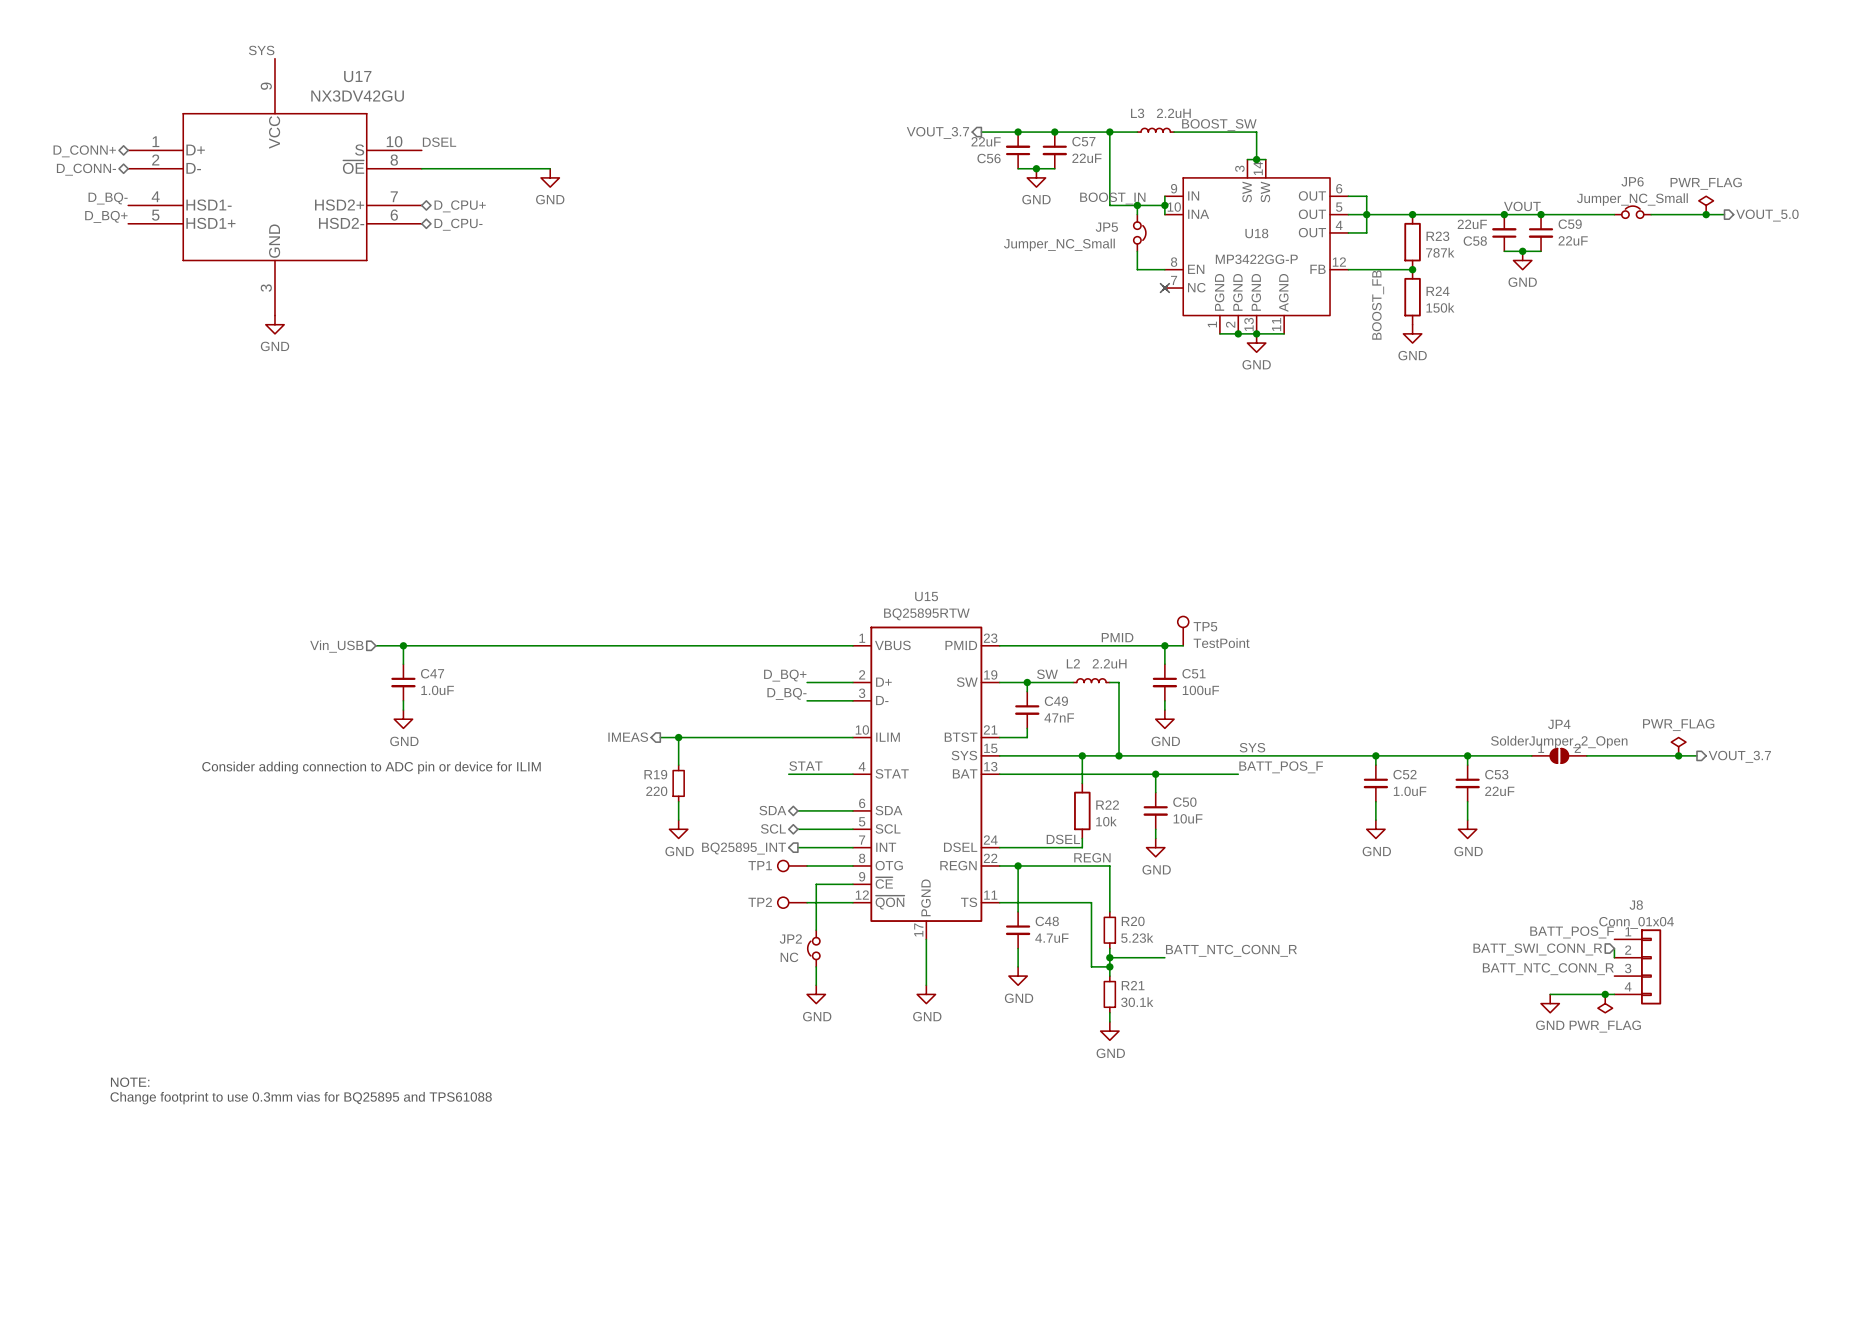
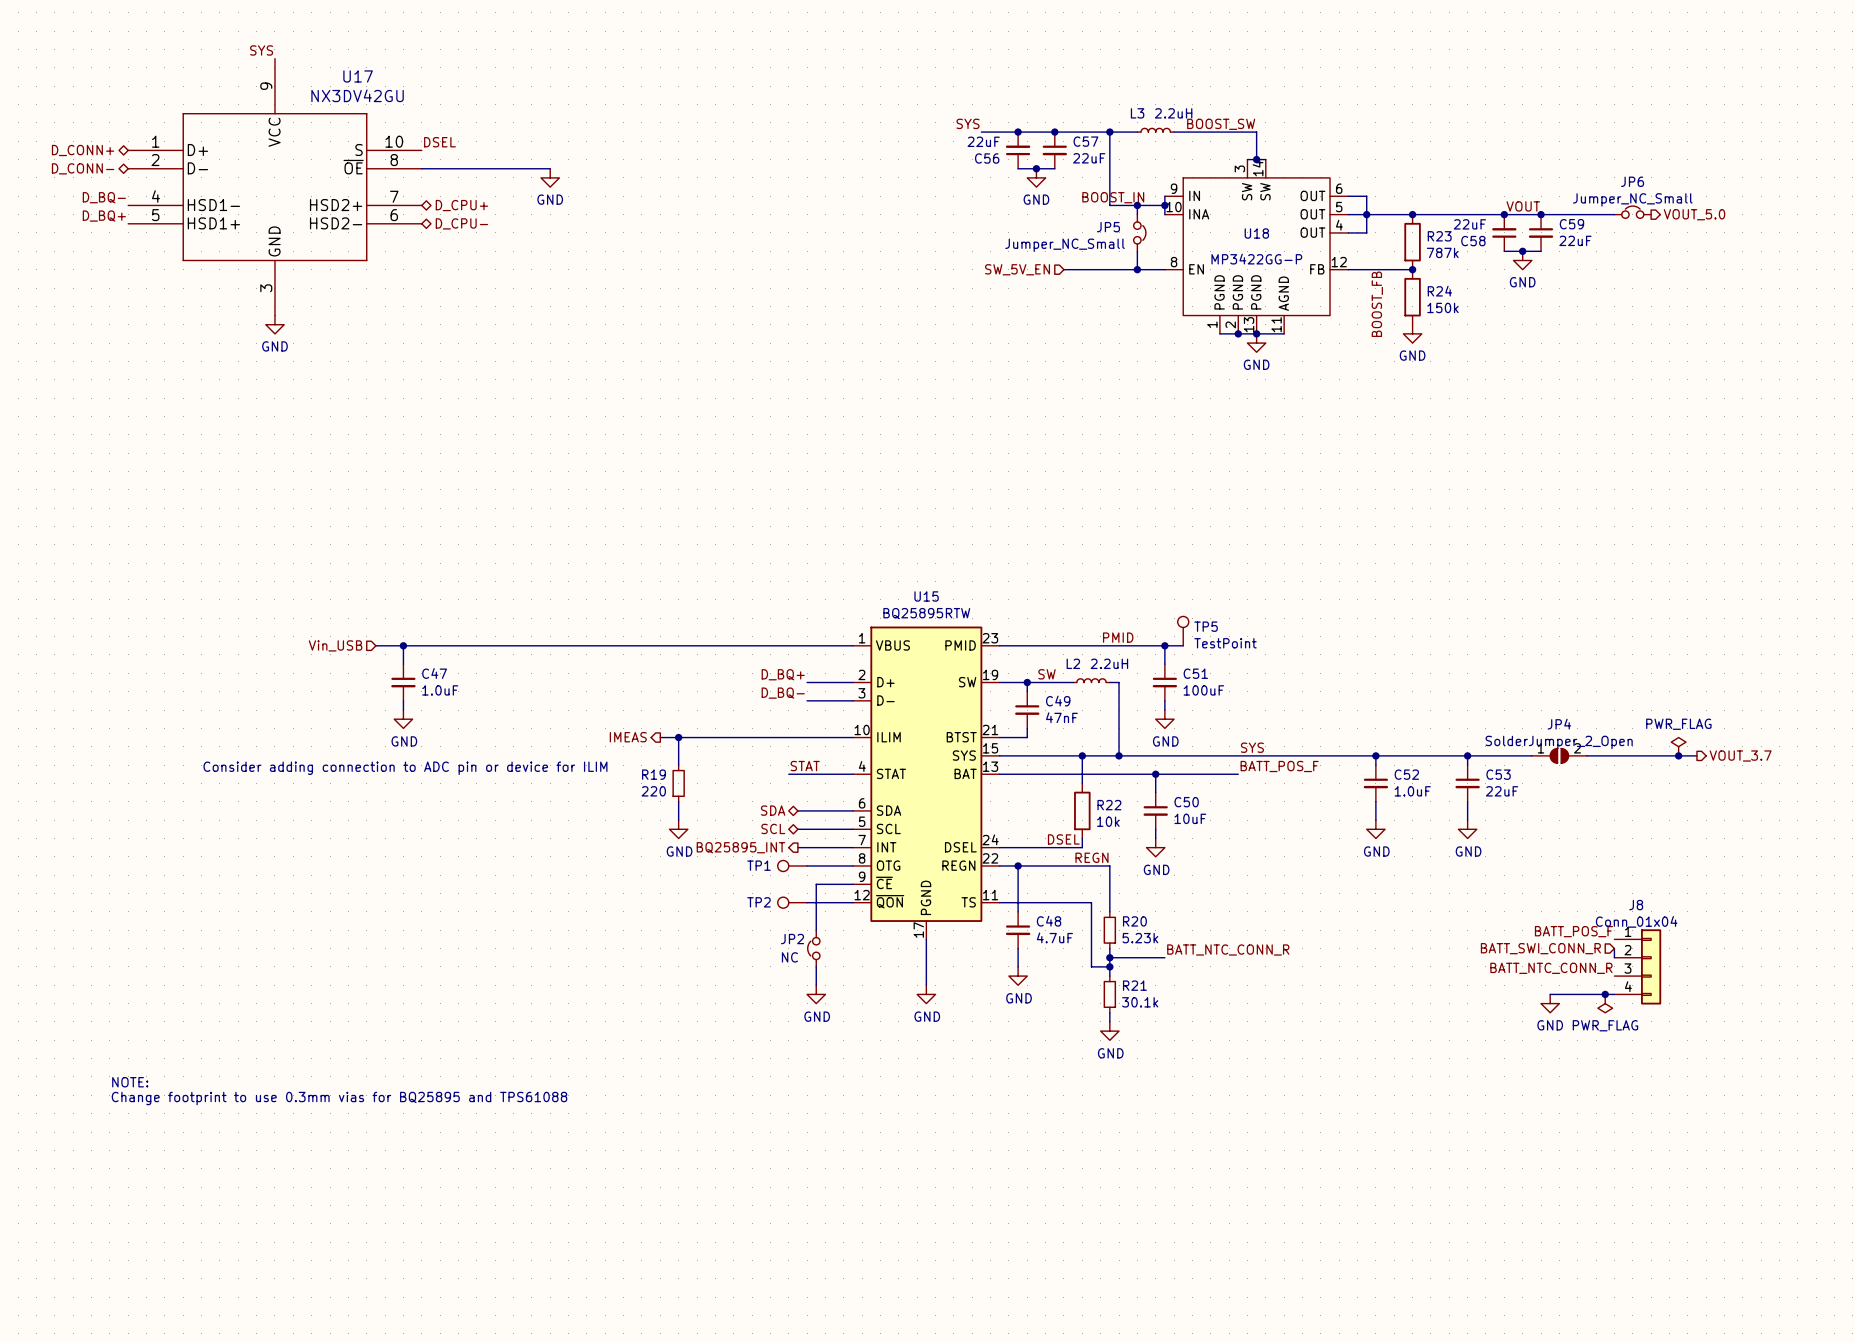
label: none -> SYS (968, 123)
hierarchical label: VOUT_3.7 (937, 132) -> none
U18 symbol: [1162, 159, 1349, 334] -> [1164, 159, 1349, 334]
power symbol: PWR_FLAG (1706, 205) -> none
wire: (1651, 214) (1724, 214) -> none
junction: (1706, 214) -> none
hierarchical label position: VOUT_5.0 (1767, 215) -> VOUT_5.0 (1694, 214)
wire: none -> (1063, 269) (1137, 269)
junction: none -> (1137, 269)
hierarchical label: none -> SW_5V_EN (1017, 269)
no-connect mark: (1164, 288) -> none

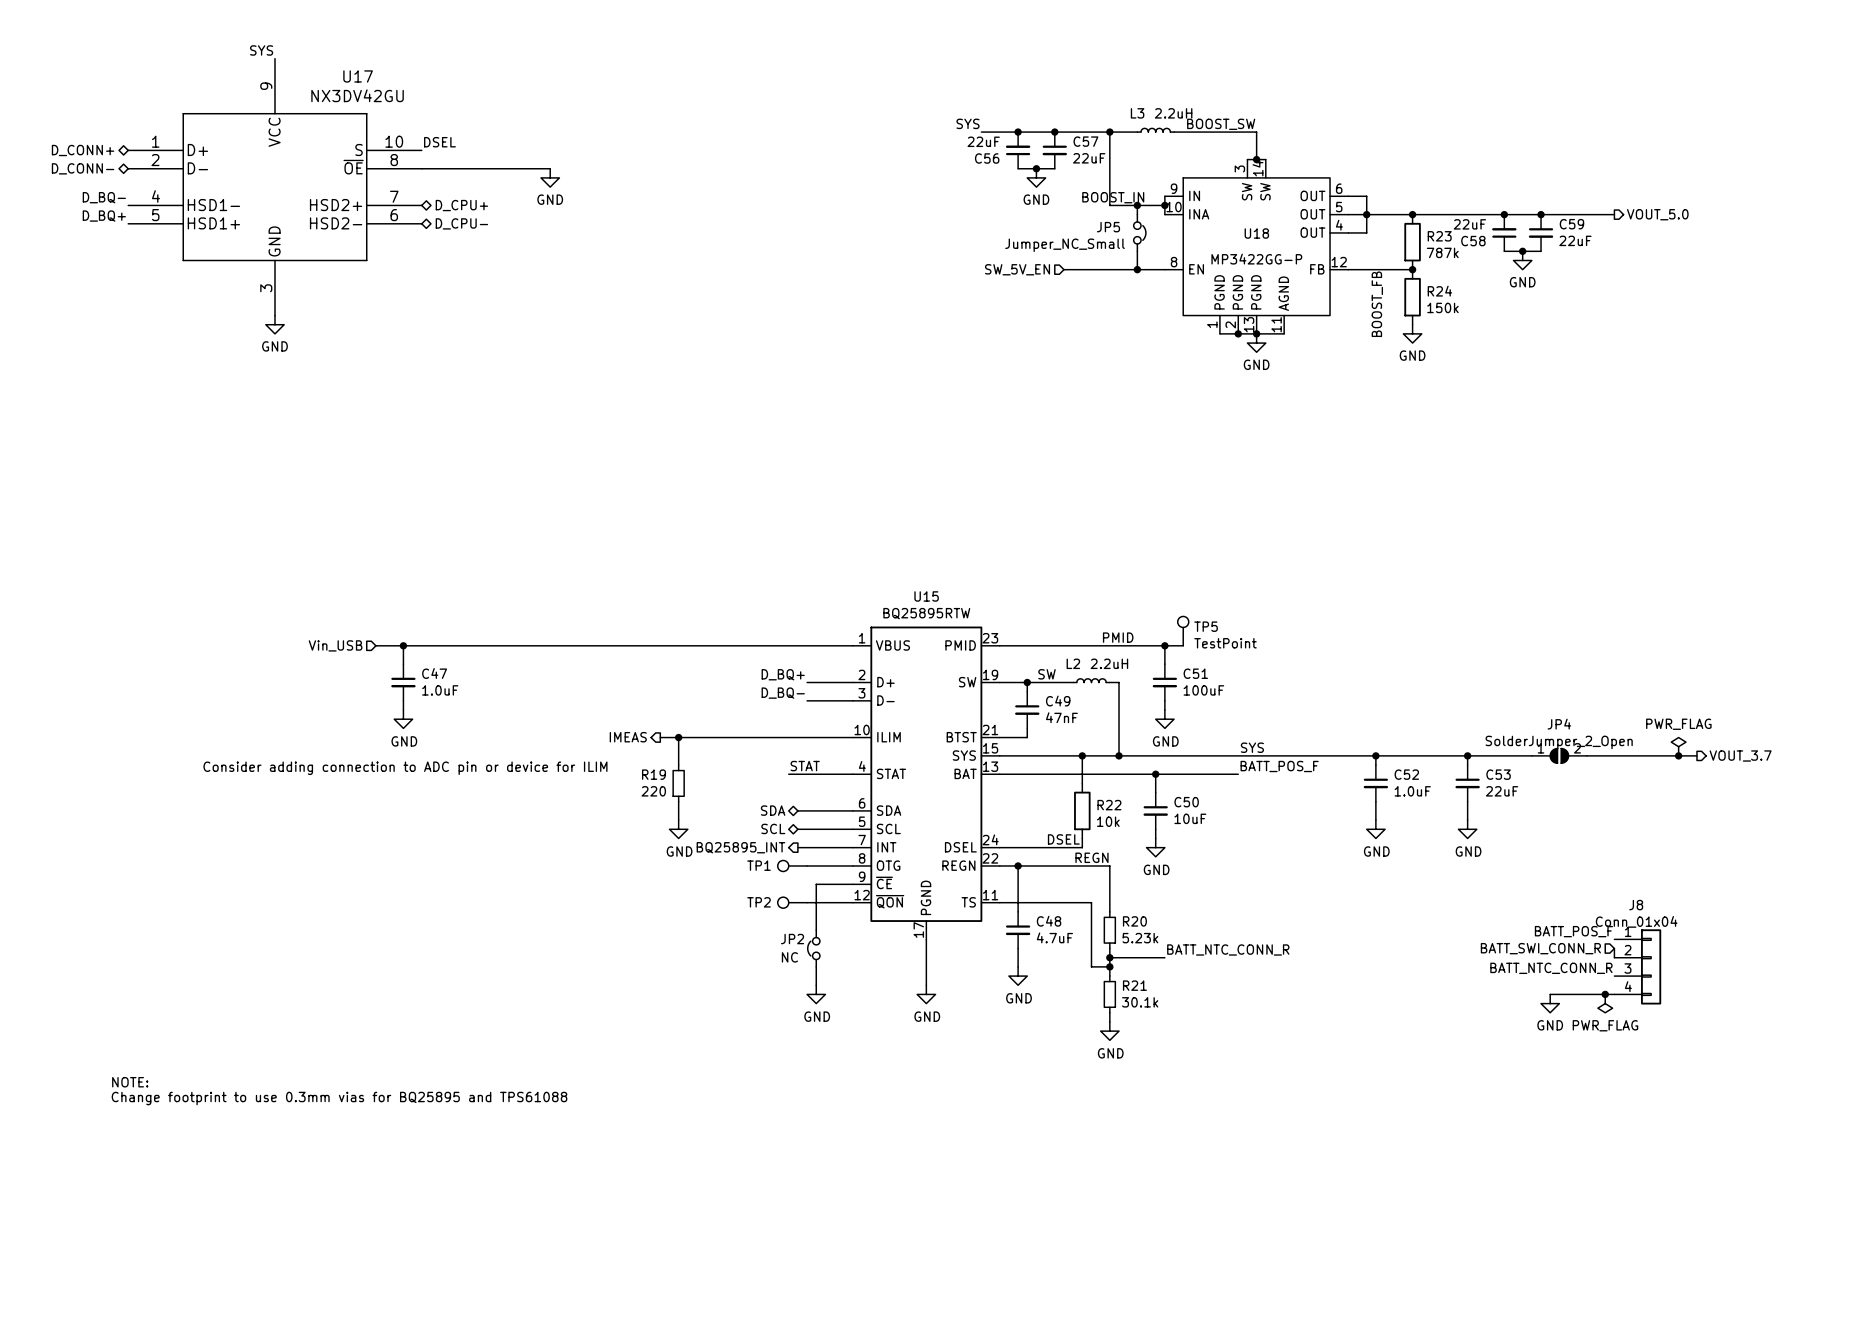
label: VOUT (1523, 206) -> none
JP6: Jumper_NC_Small (1632, 212) -> none
hierarchical label position: VOUT_5.0 (1694, 214) -> VOUT_5.0 (1657, 214)

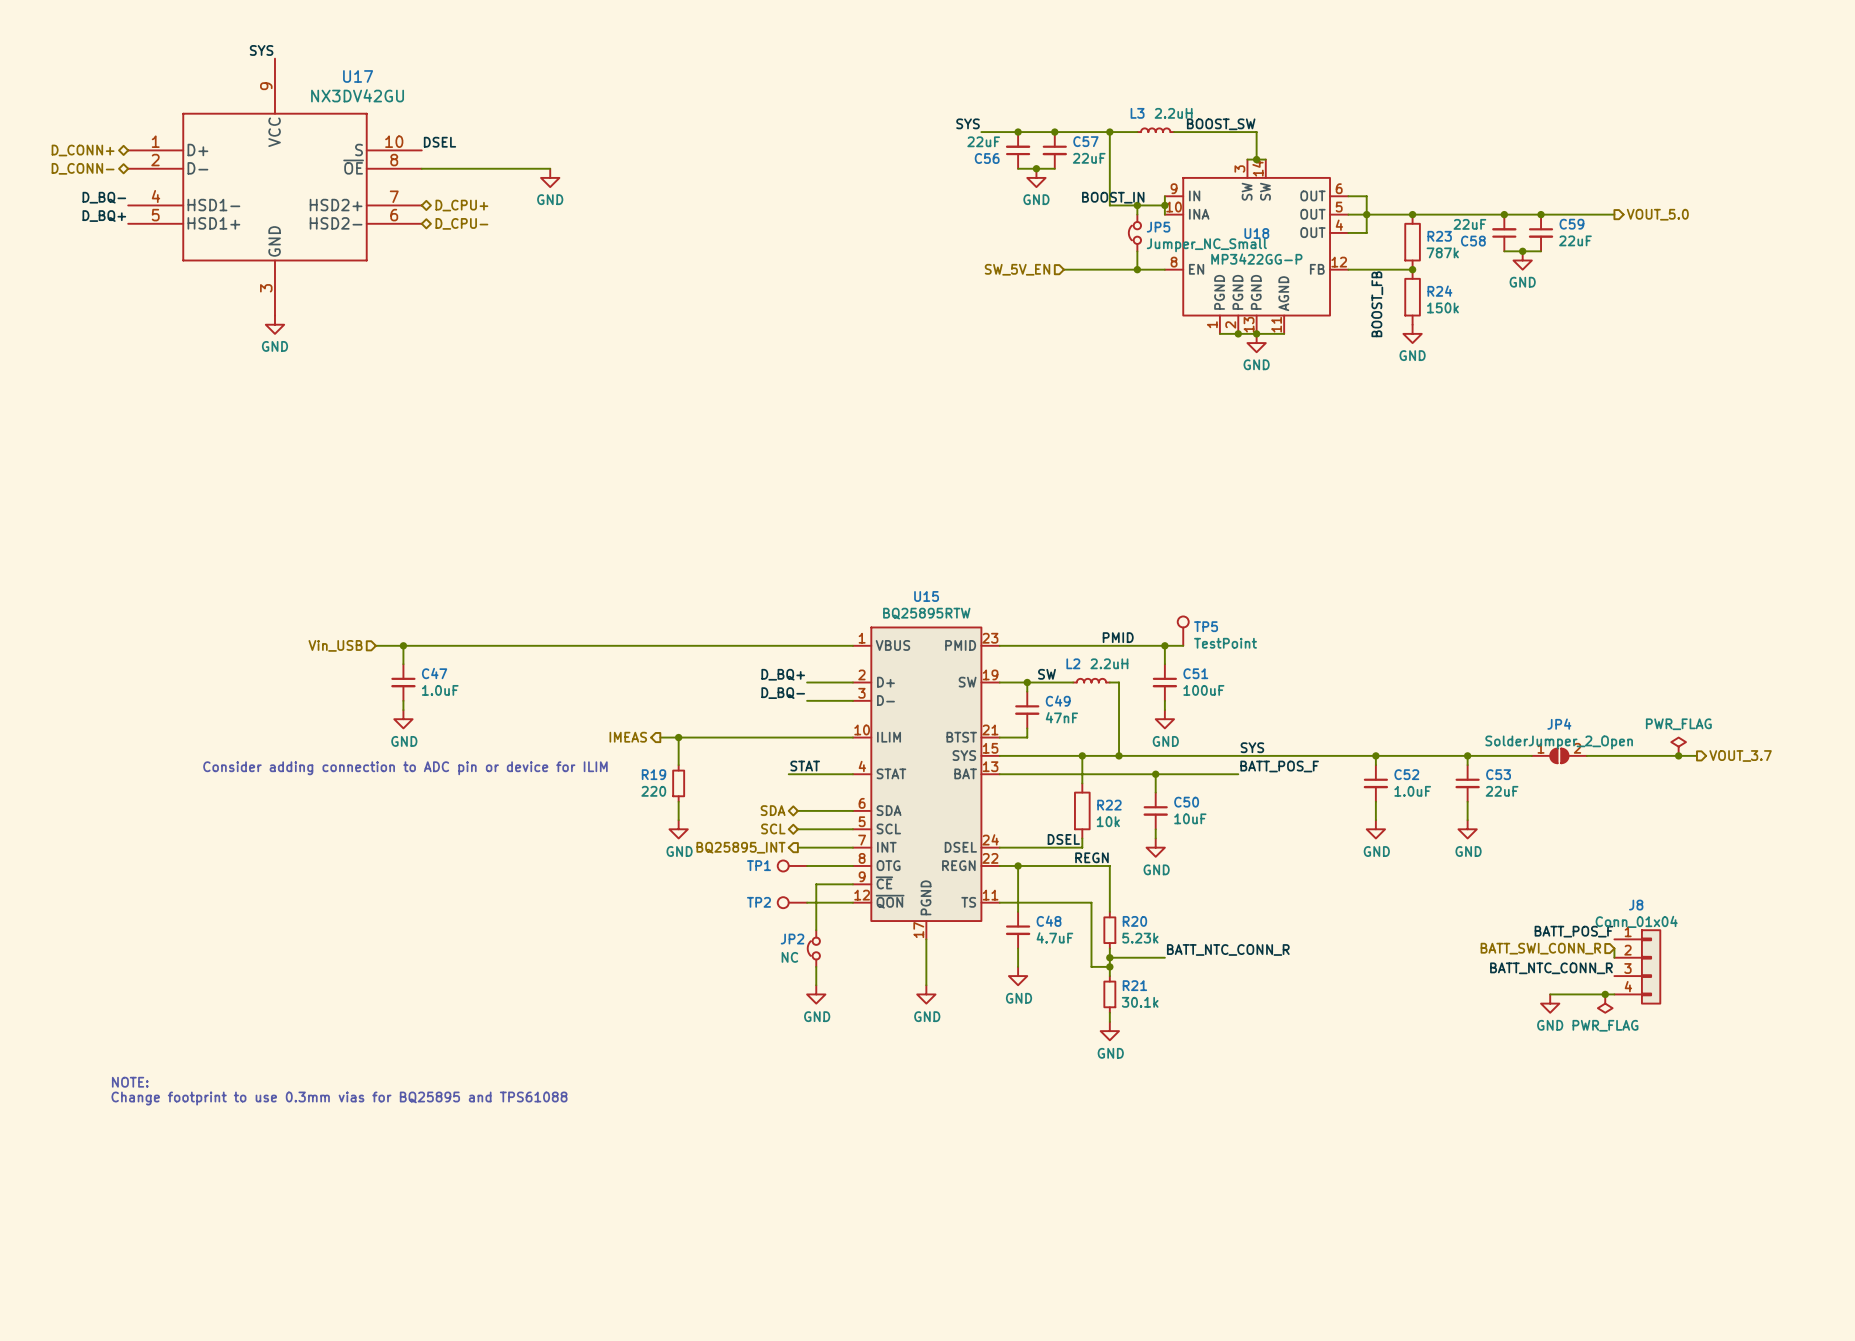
JP5 rotation: 0° (1139, 232) -> 180° (1134, 232)
JP5 value position: Jumper_NC_Small (1065, 245) -> Jumper_NC_Small (1206, 245)

